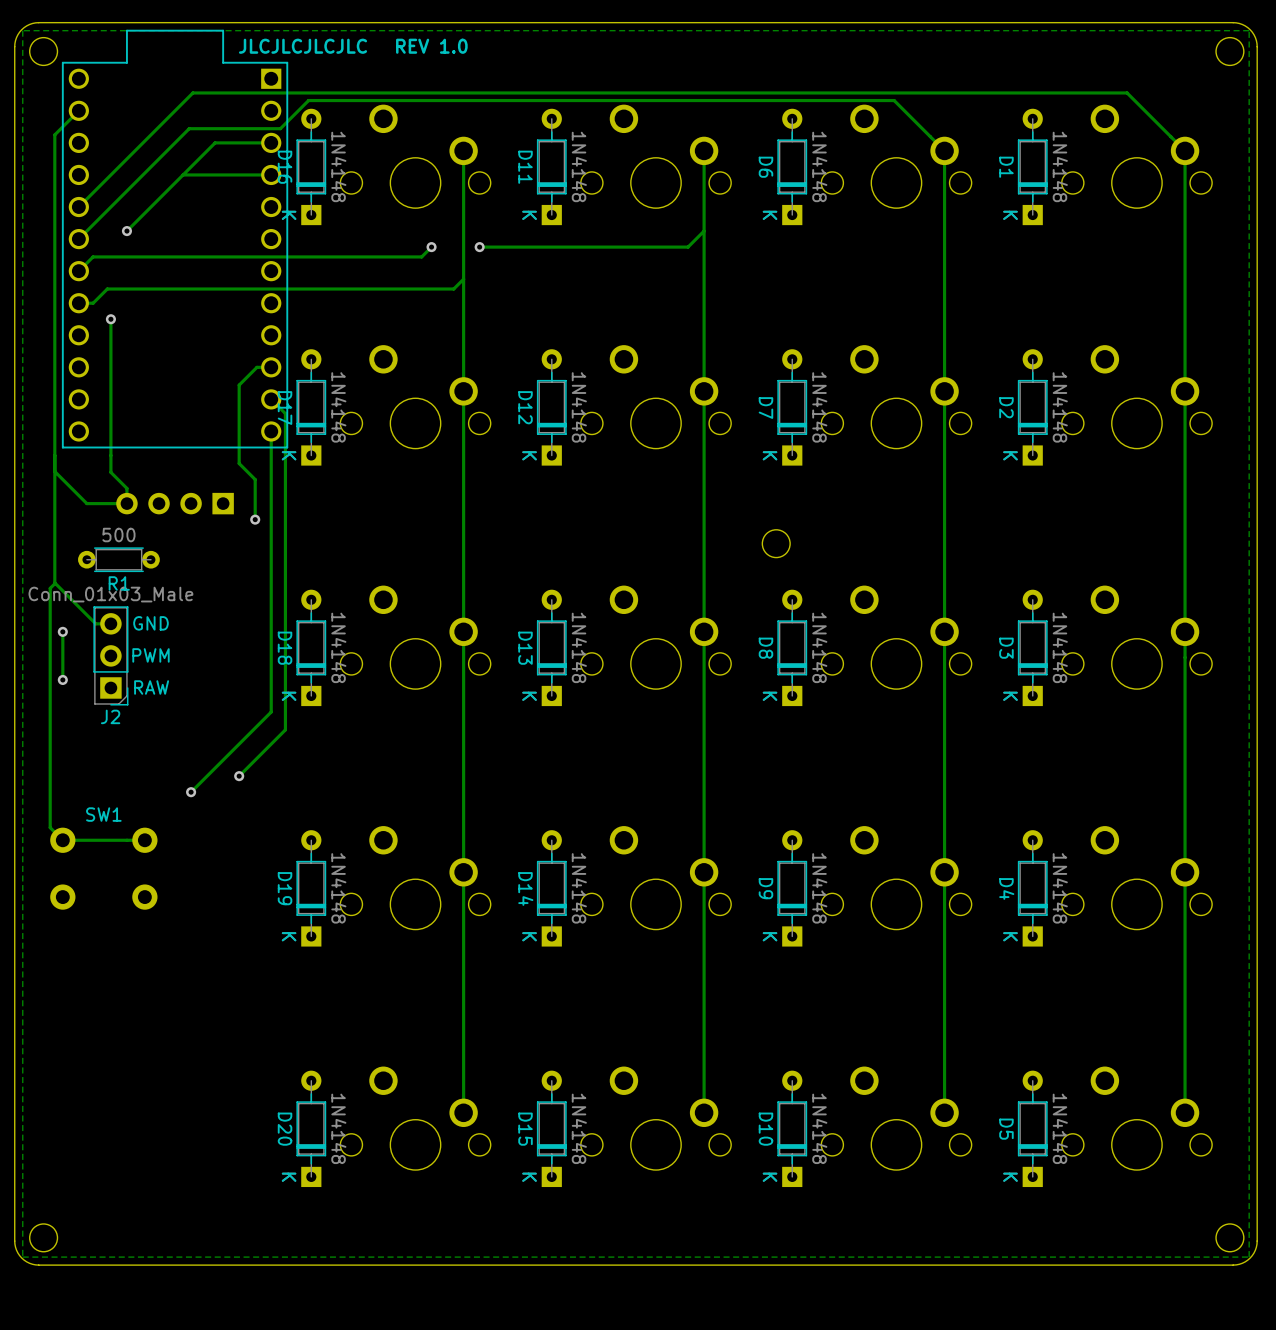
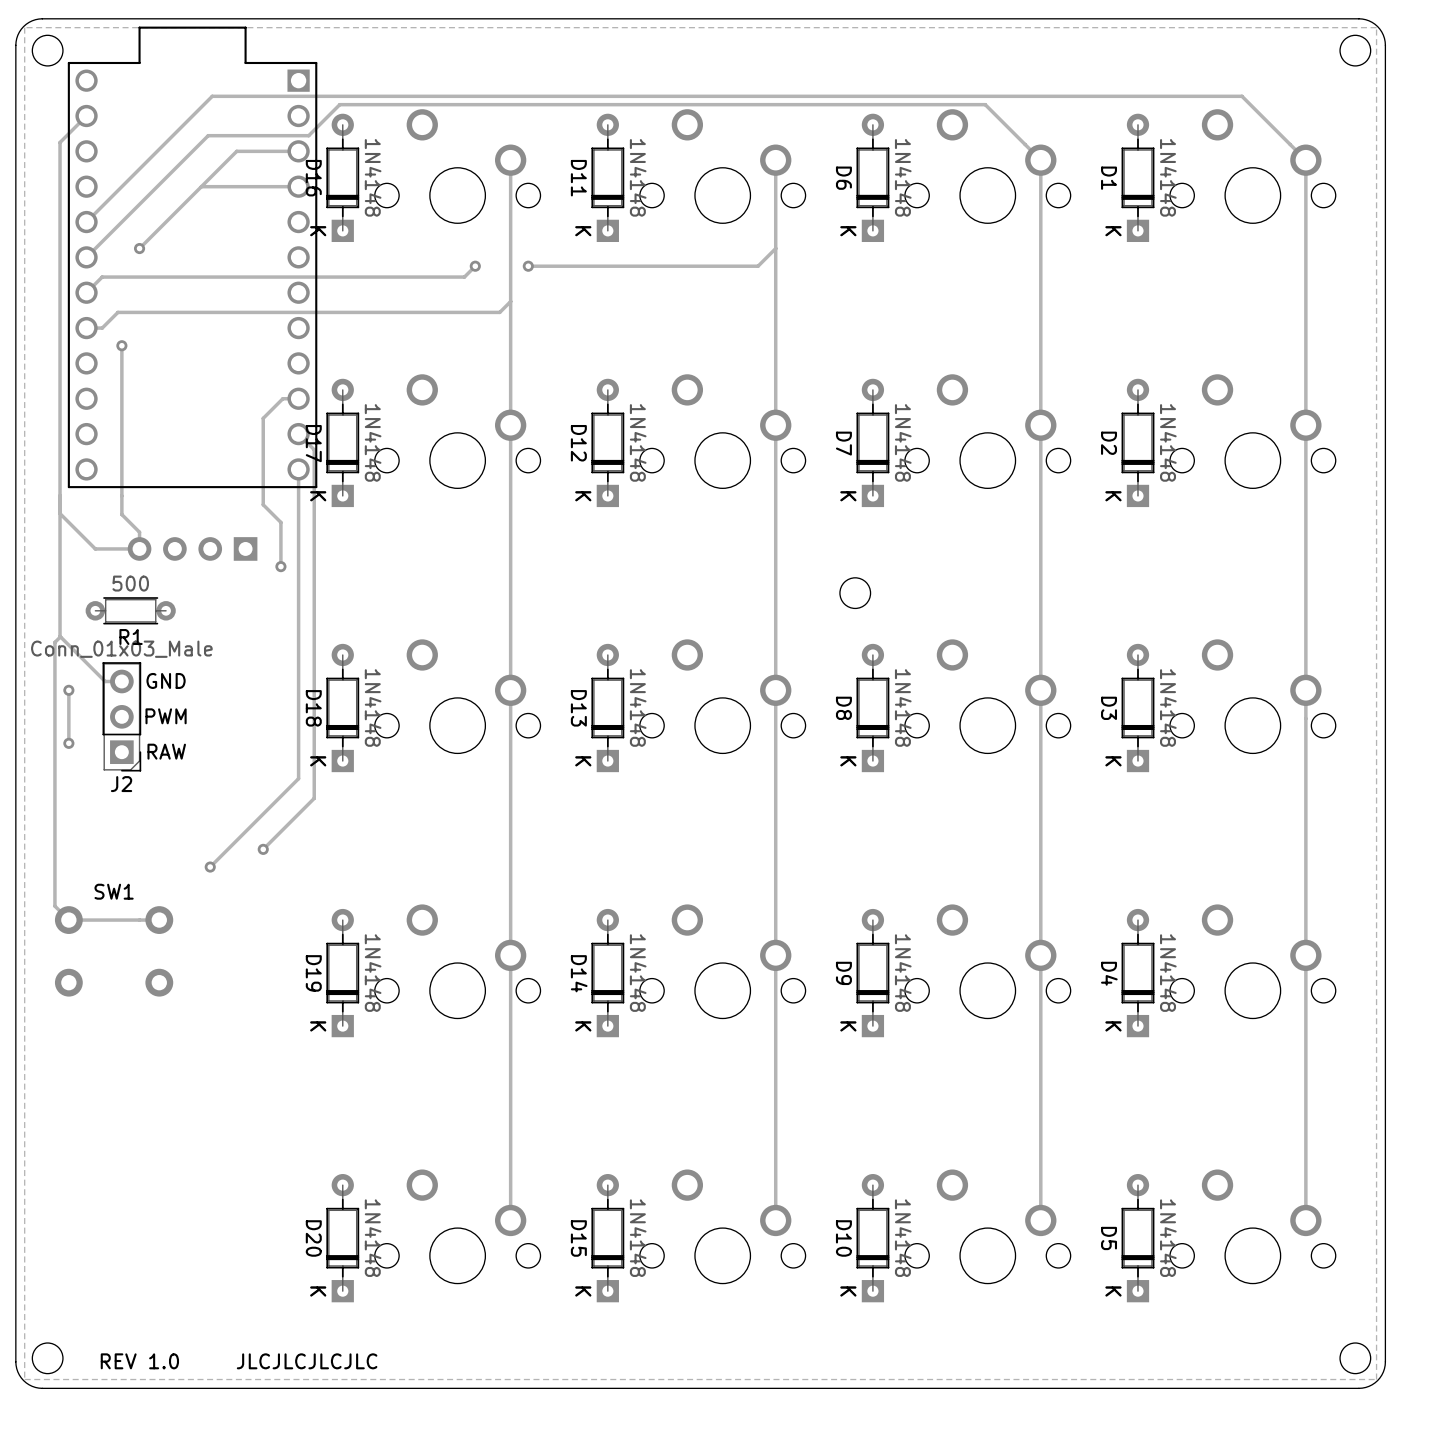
text: JLCJLCJLCJLC (303, 46) -> none
text: REV 1.0 (431, 46) -> none
text: none -> REV 1.0 (139, 1361)
text: none -> JLCJLCJLCJLC (307, 1361)

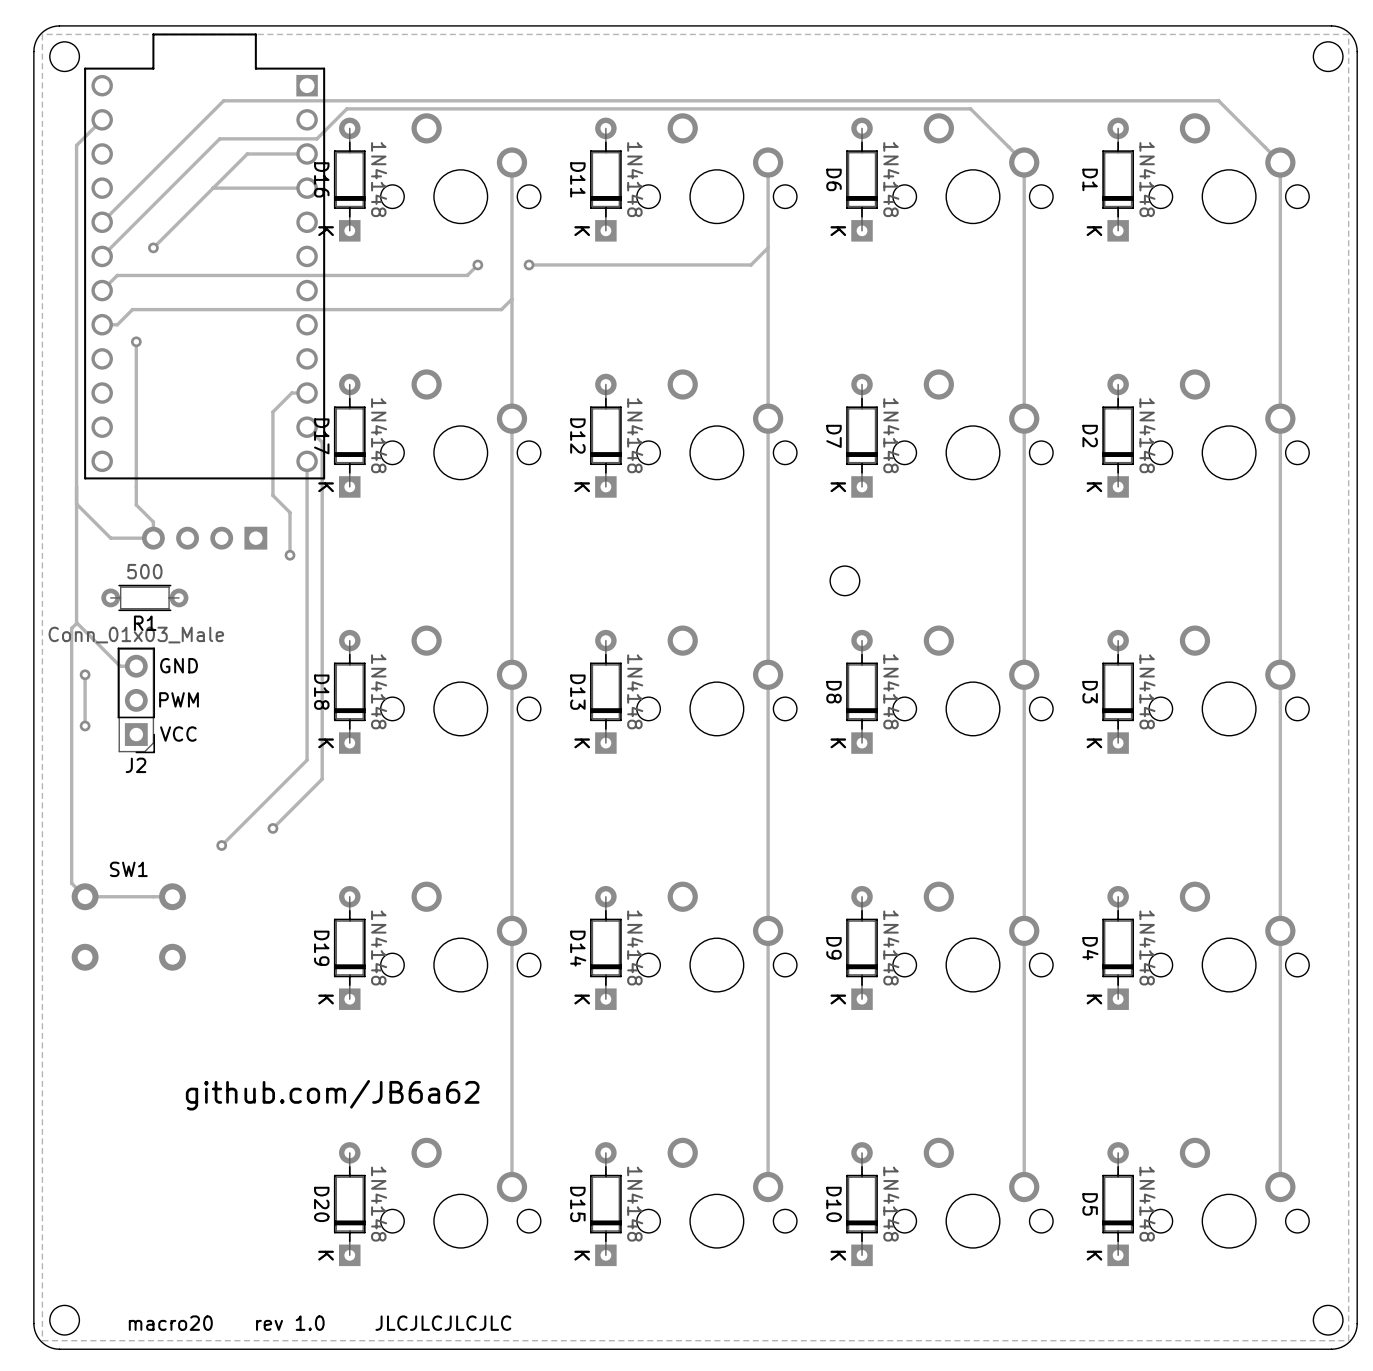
text: RAW (166, 751) -> VCC (178, 734)
text: none -> github.com/JB6a62 (332, 1095)
text: REV 1.0 (139, 1361) -> none
text: none -> macro20 (170, 1323)
text: none -> rev 1.0 (290, 1323)
text position: JLCJLCJLCJLC (307, 1361) -> JLCJLCJLCJLC (443, 1323)

